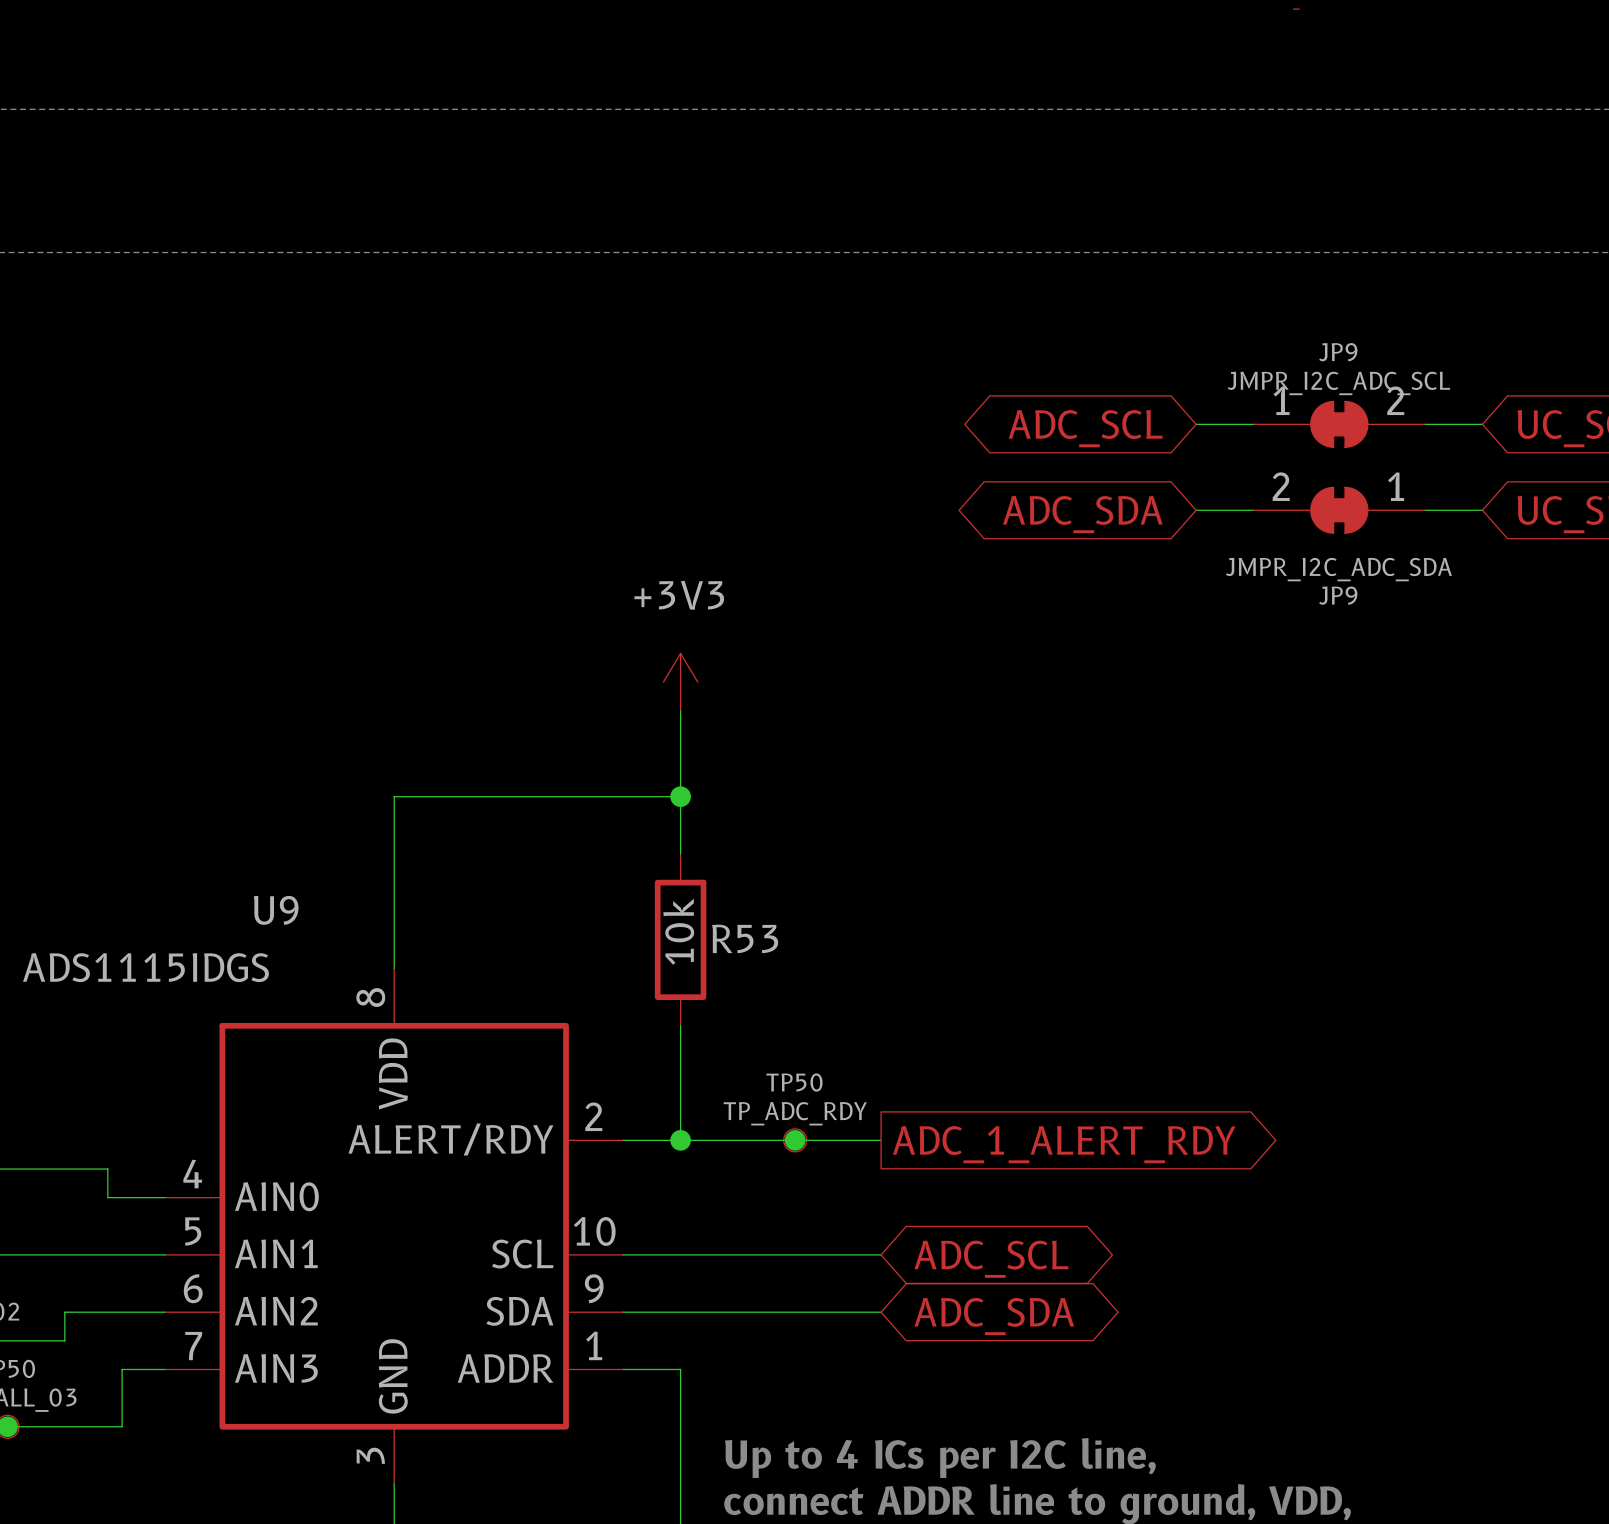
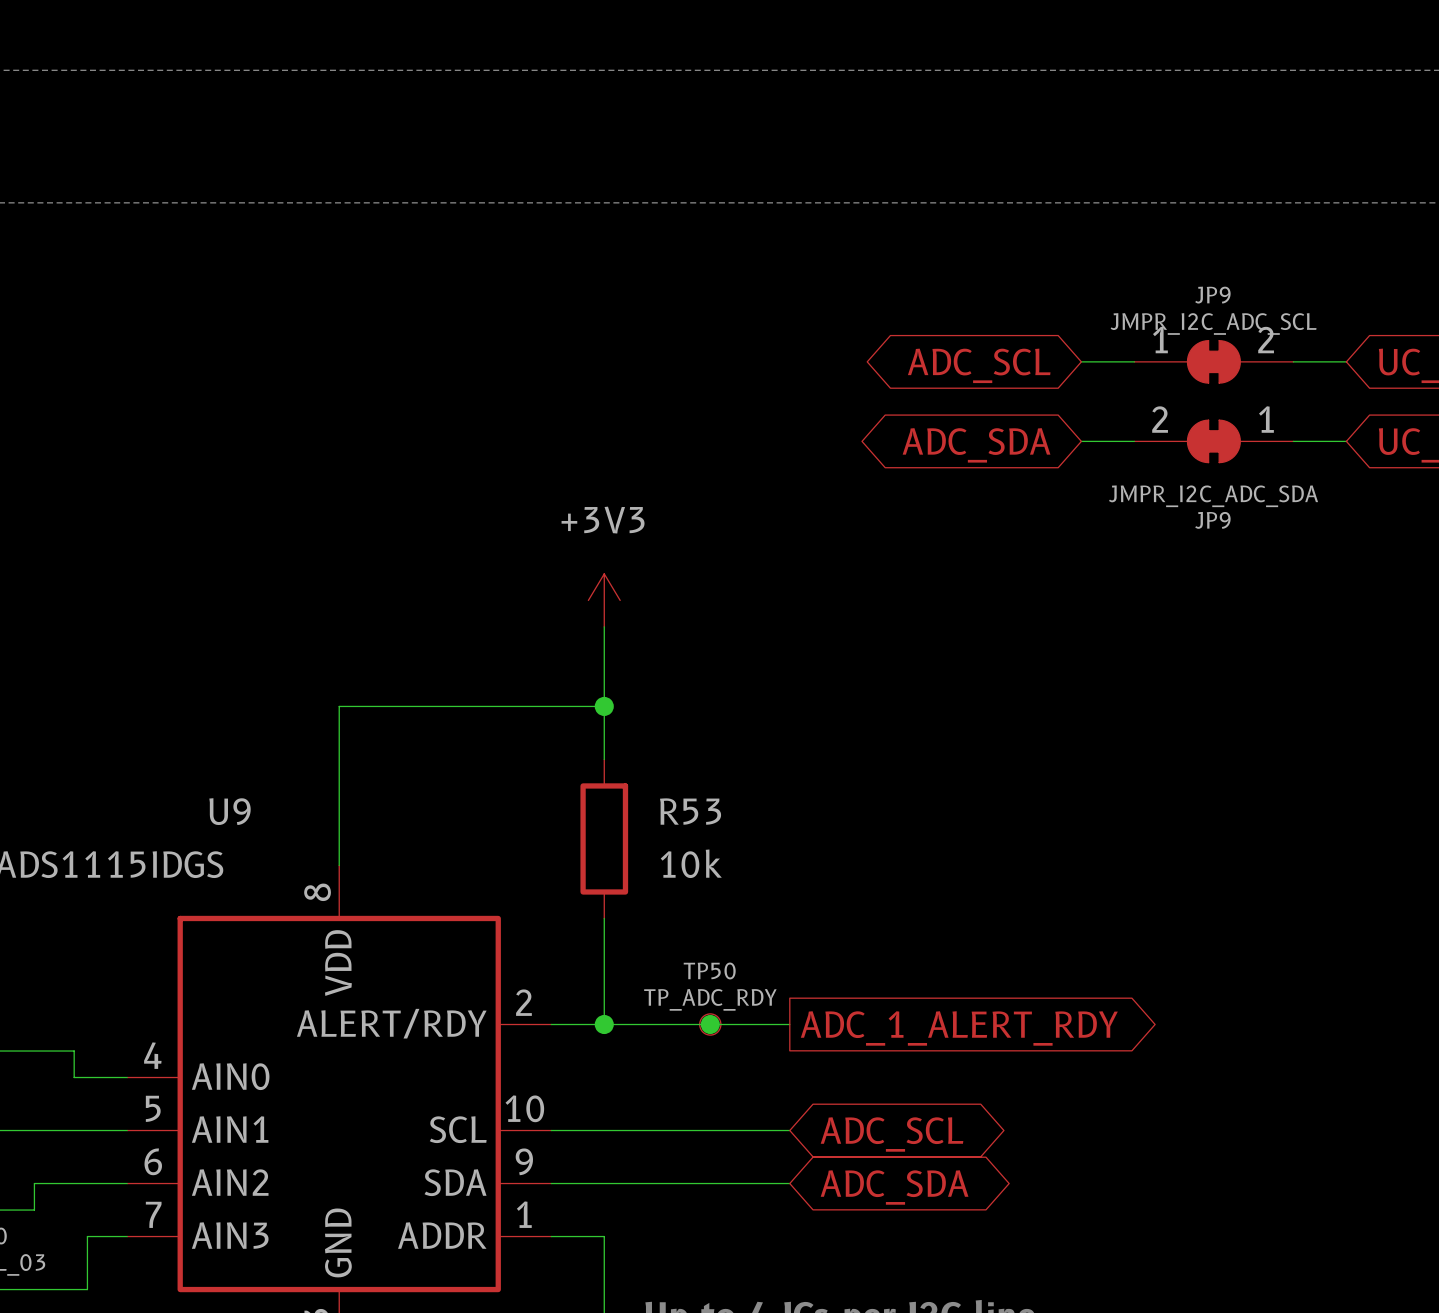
R53 value rotation: 0° (678, 931) -> 90° clockwise (691, 863)
R53 value position: 10k (678, 931) -> 10k (691, 863)
R53 name position: R53 (745, 938) -> R53 (690, 811)

